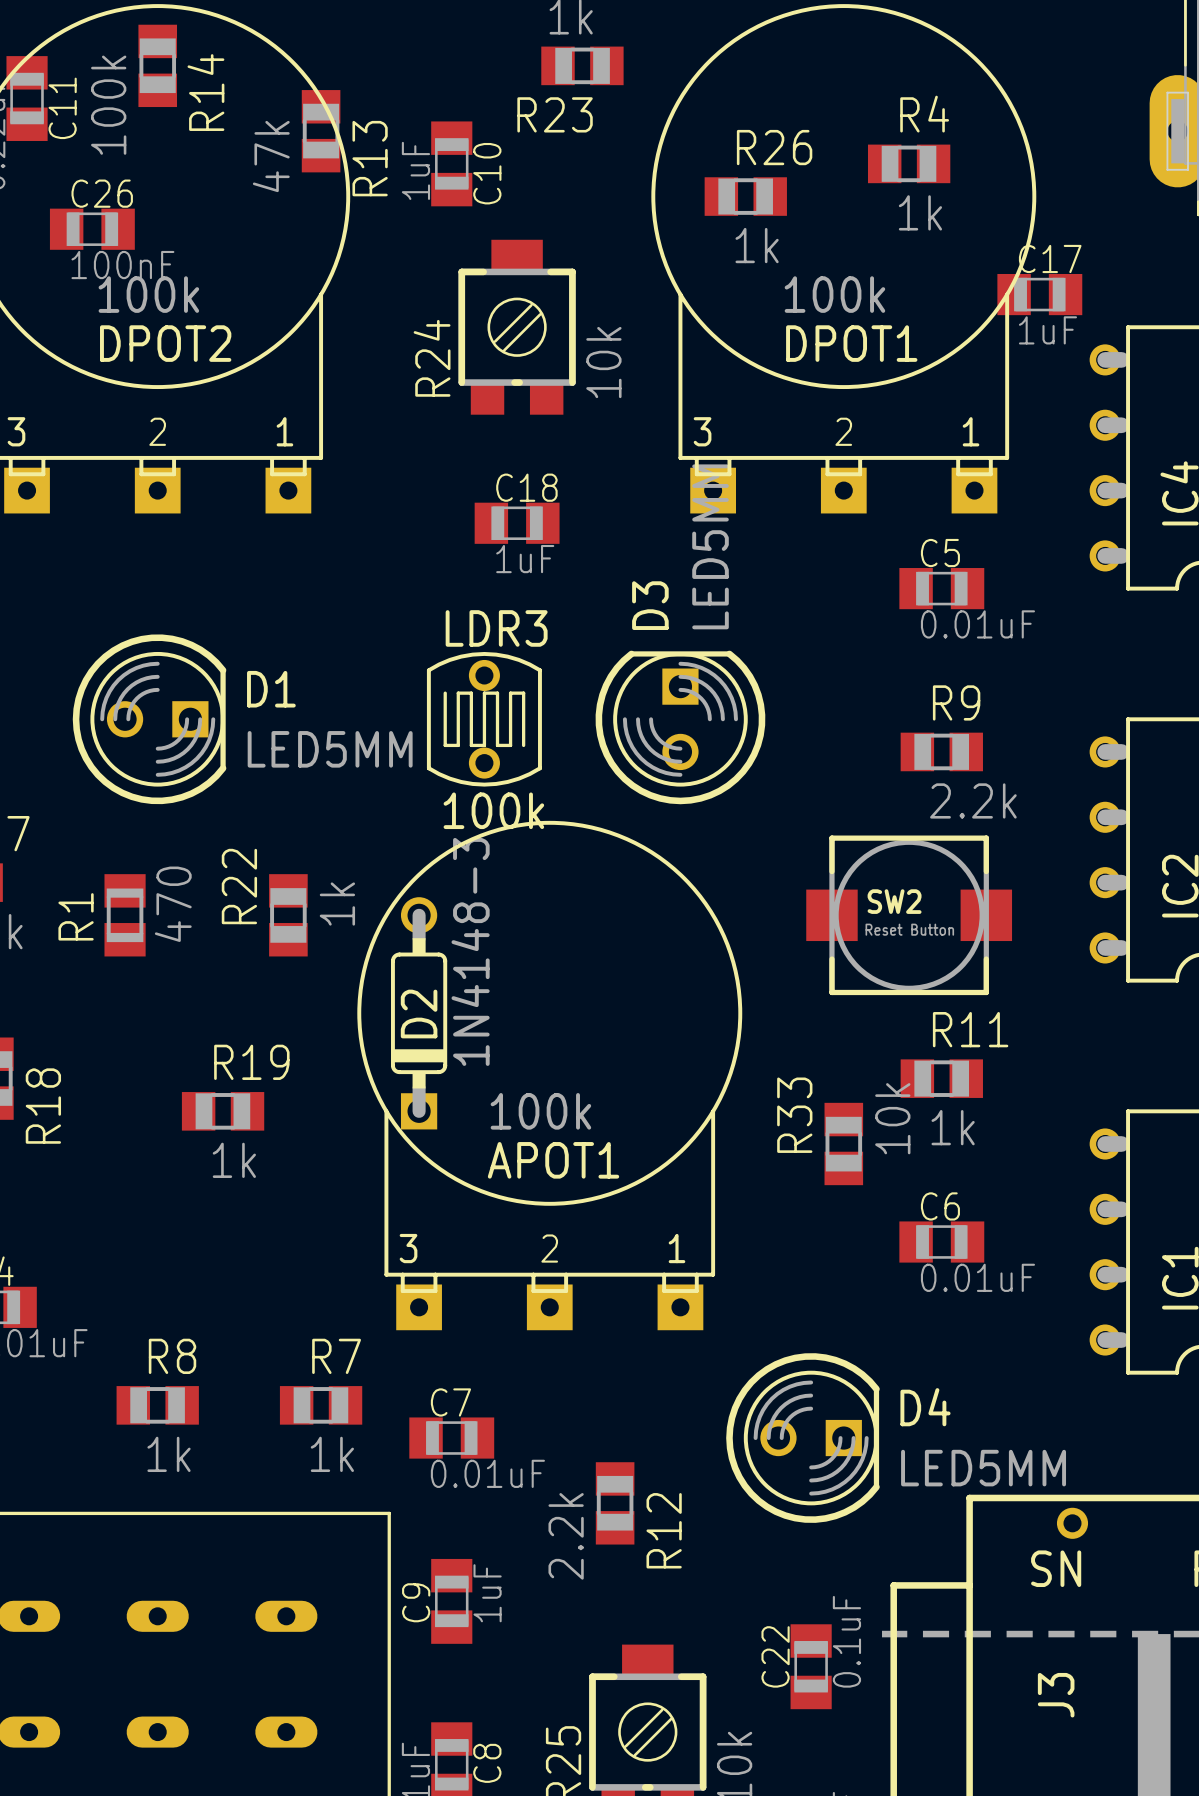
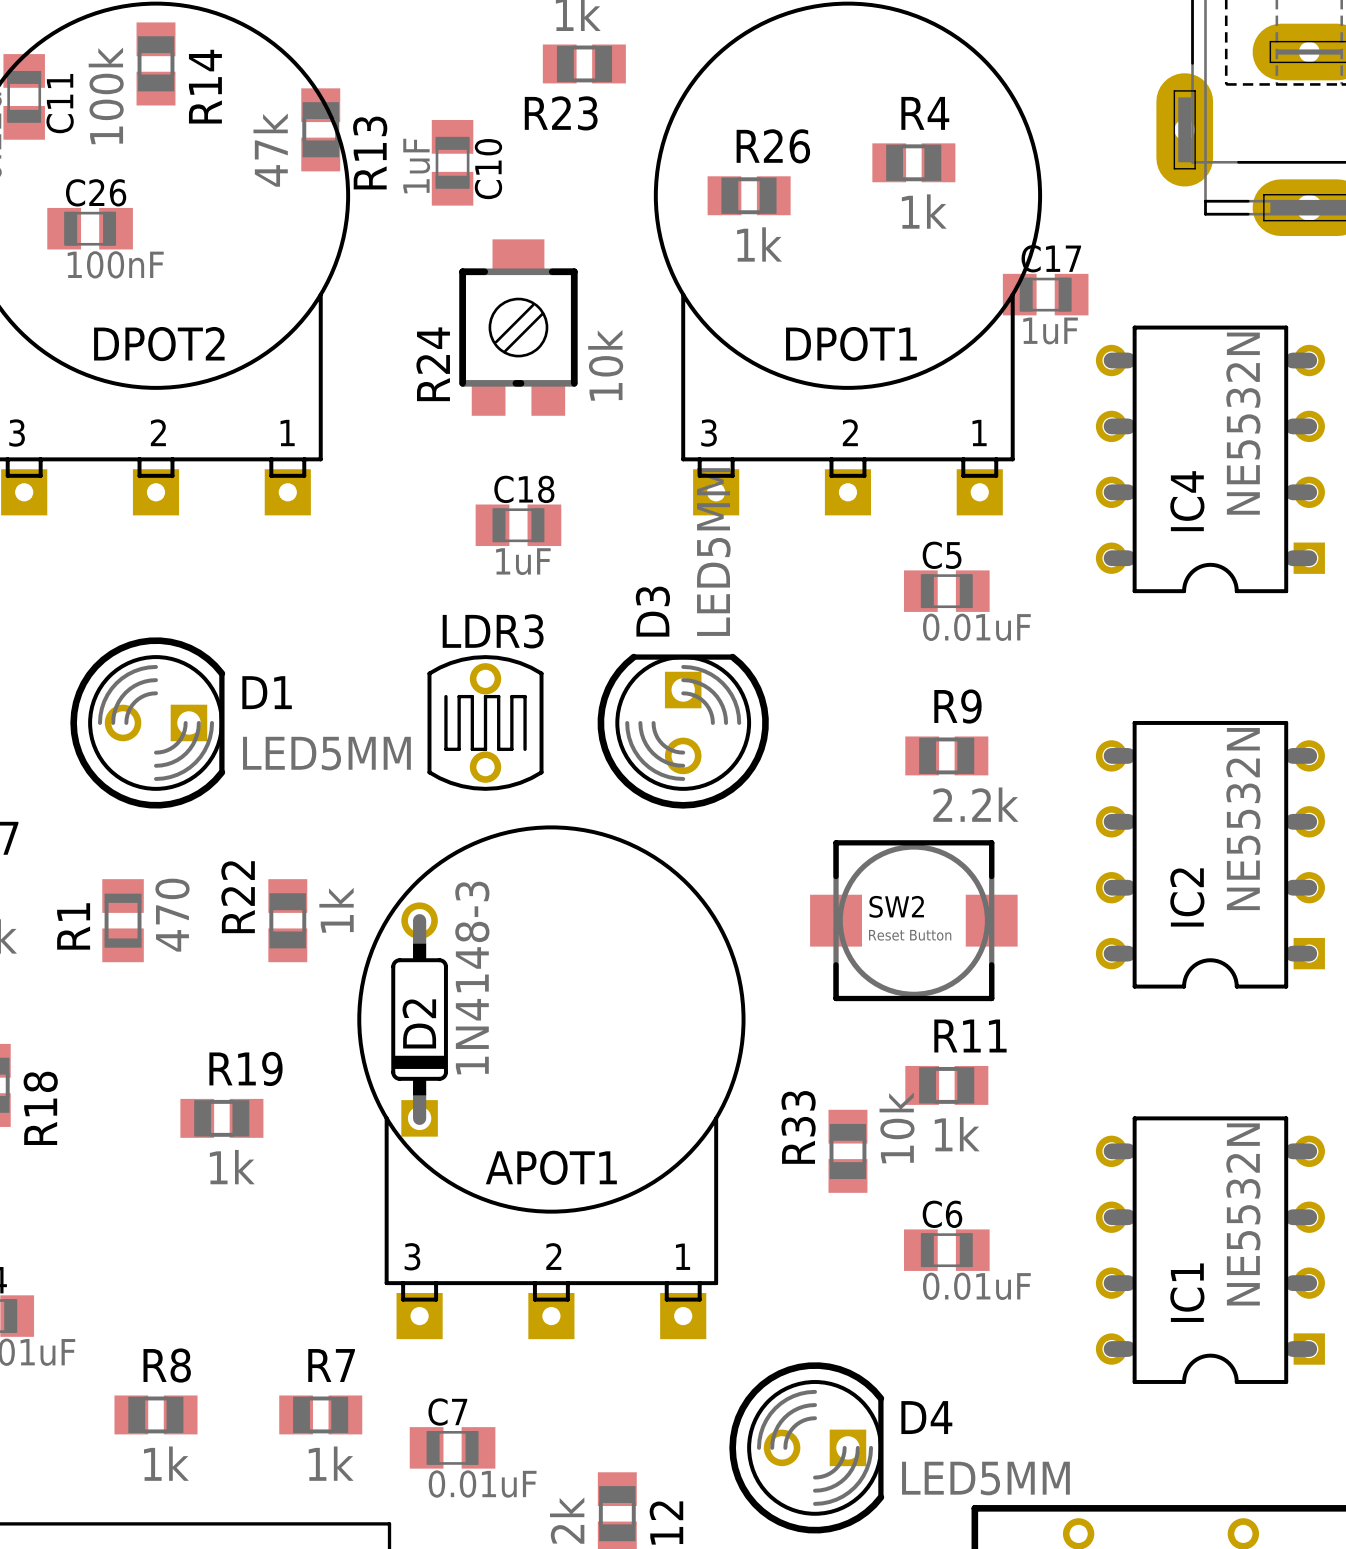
DPOT2 value: 100k (148, 294) -> none
DPOT1 value: 100k (834, 294) -> none
LDR3 value: 100k (493, 810) -> none
APOT1 value: 100k (540, 1111) -> none

